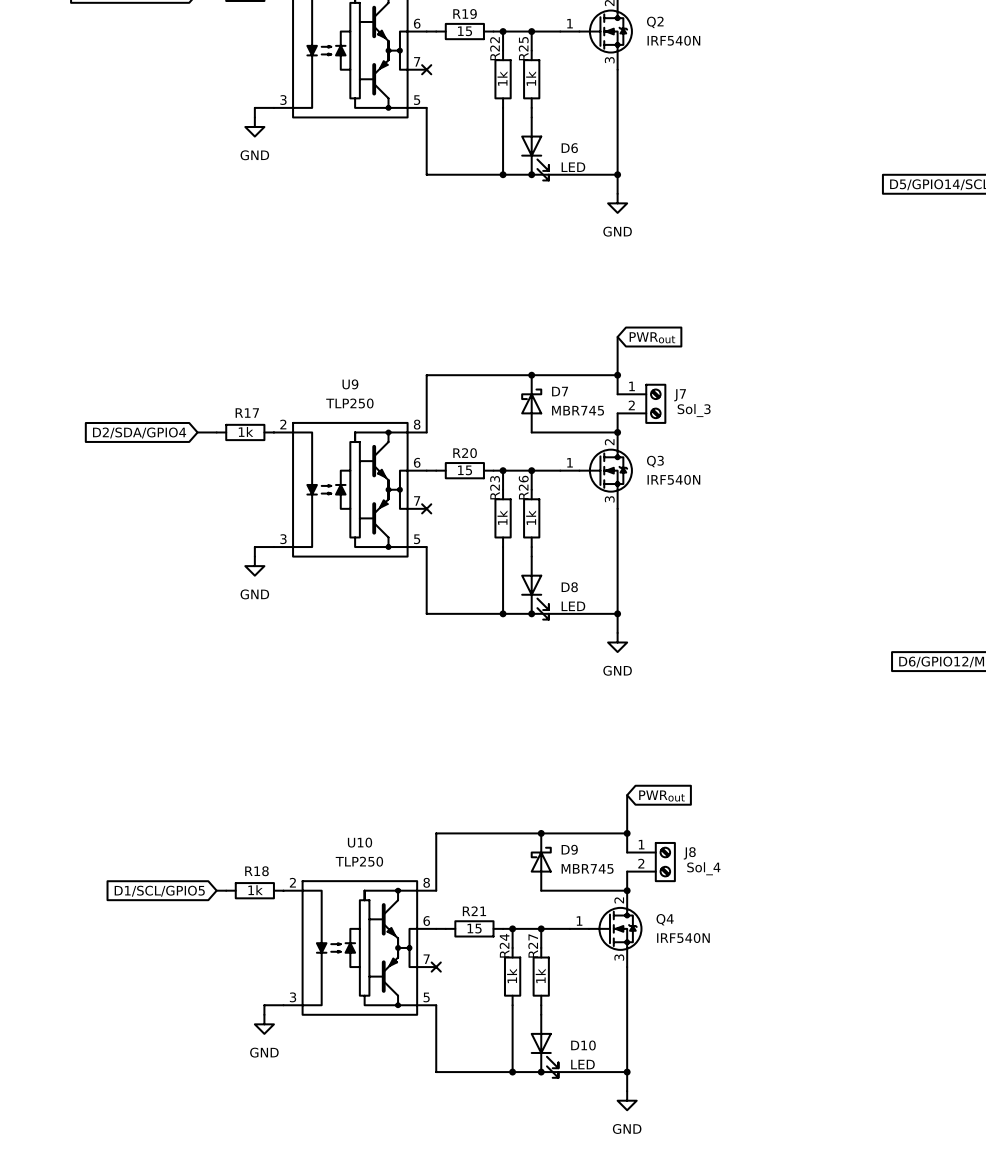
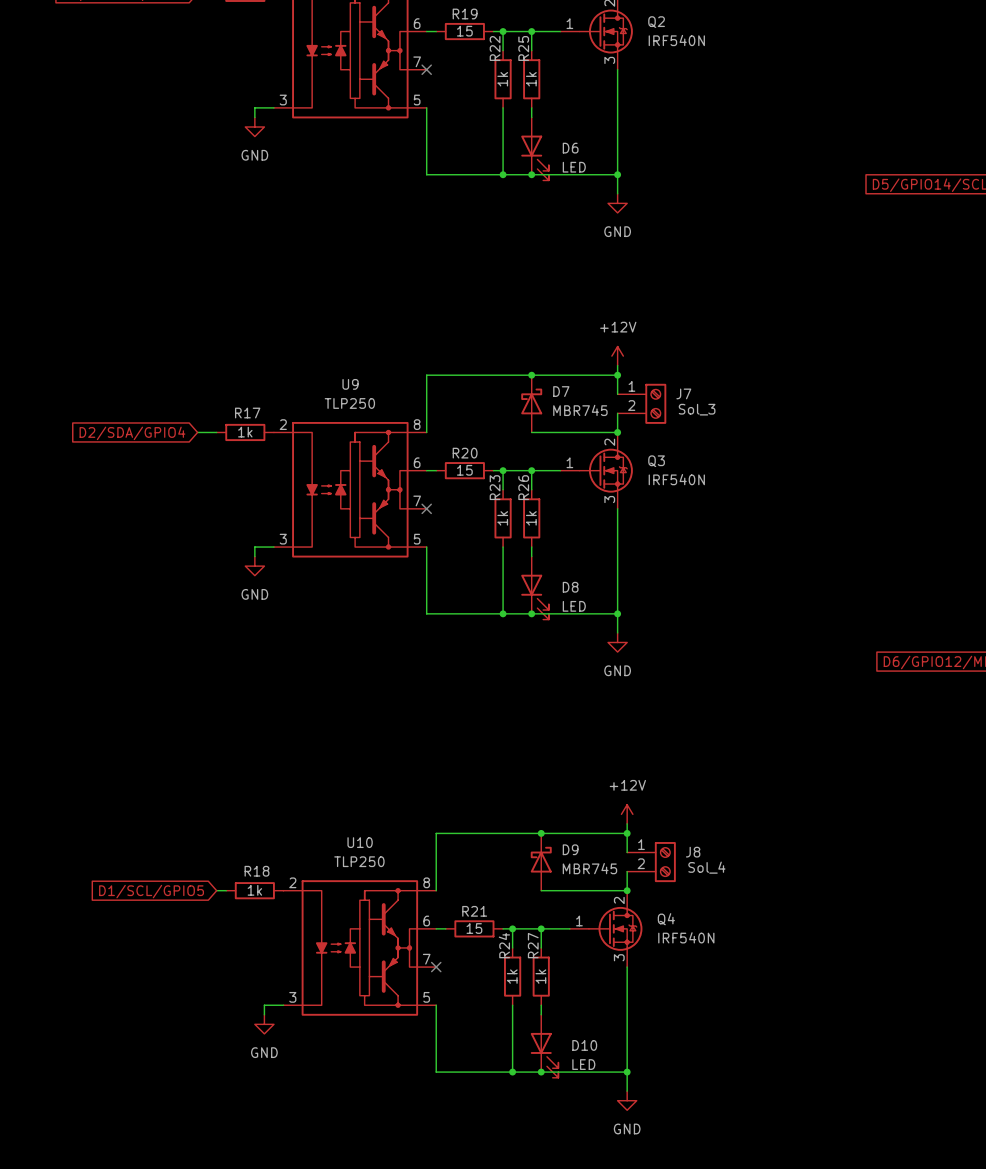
global label: PWRout (652, 337) -> none
power symbol: none -> +12V (617, 356)
global label: PWRout (661, 796) -> none
power symbol: none -> +12V (627, 814)

